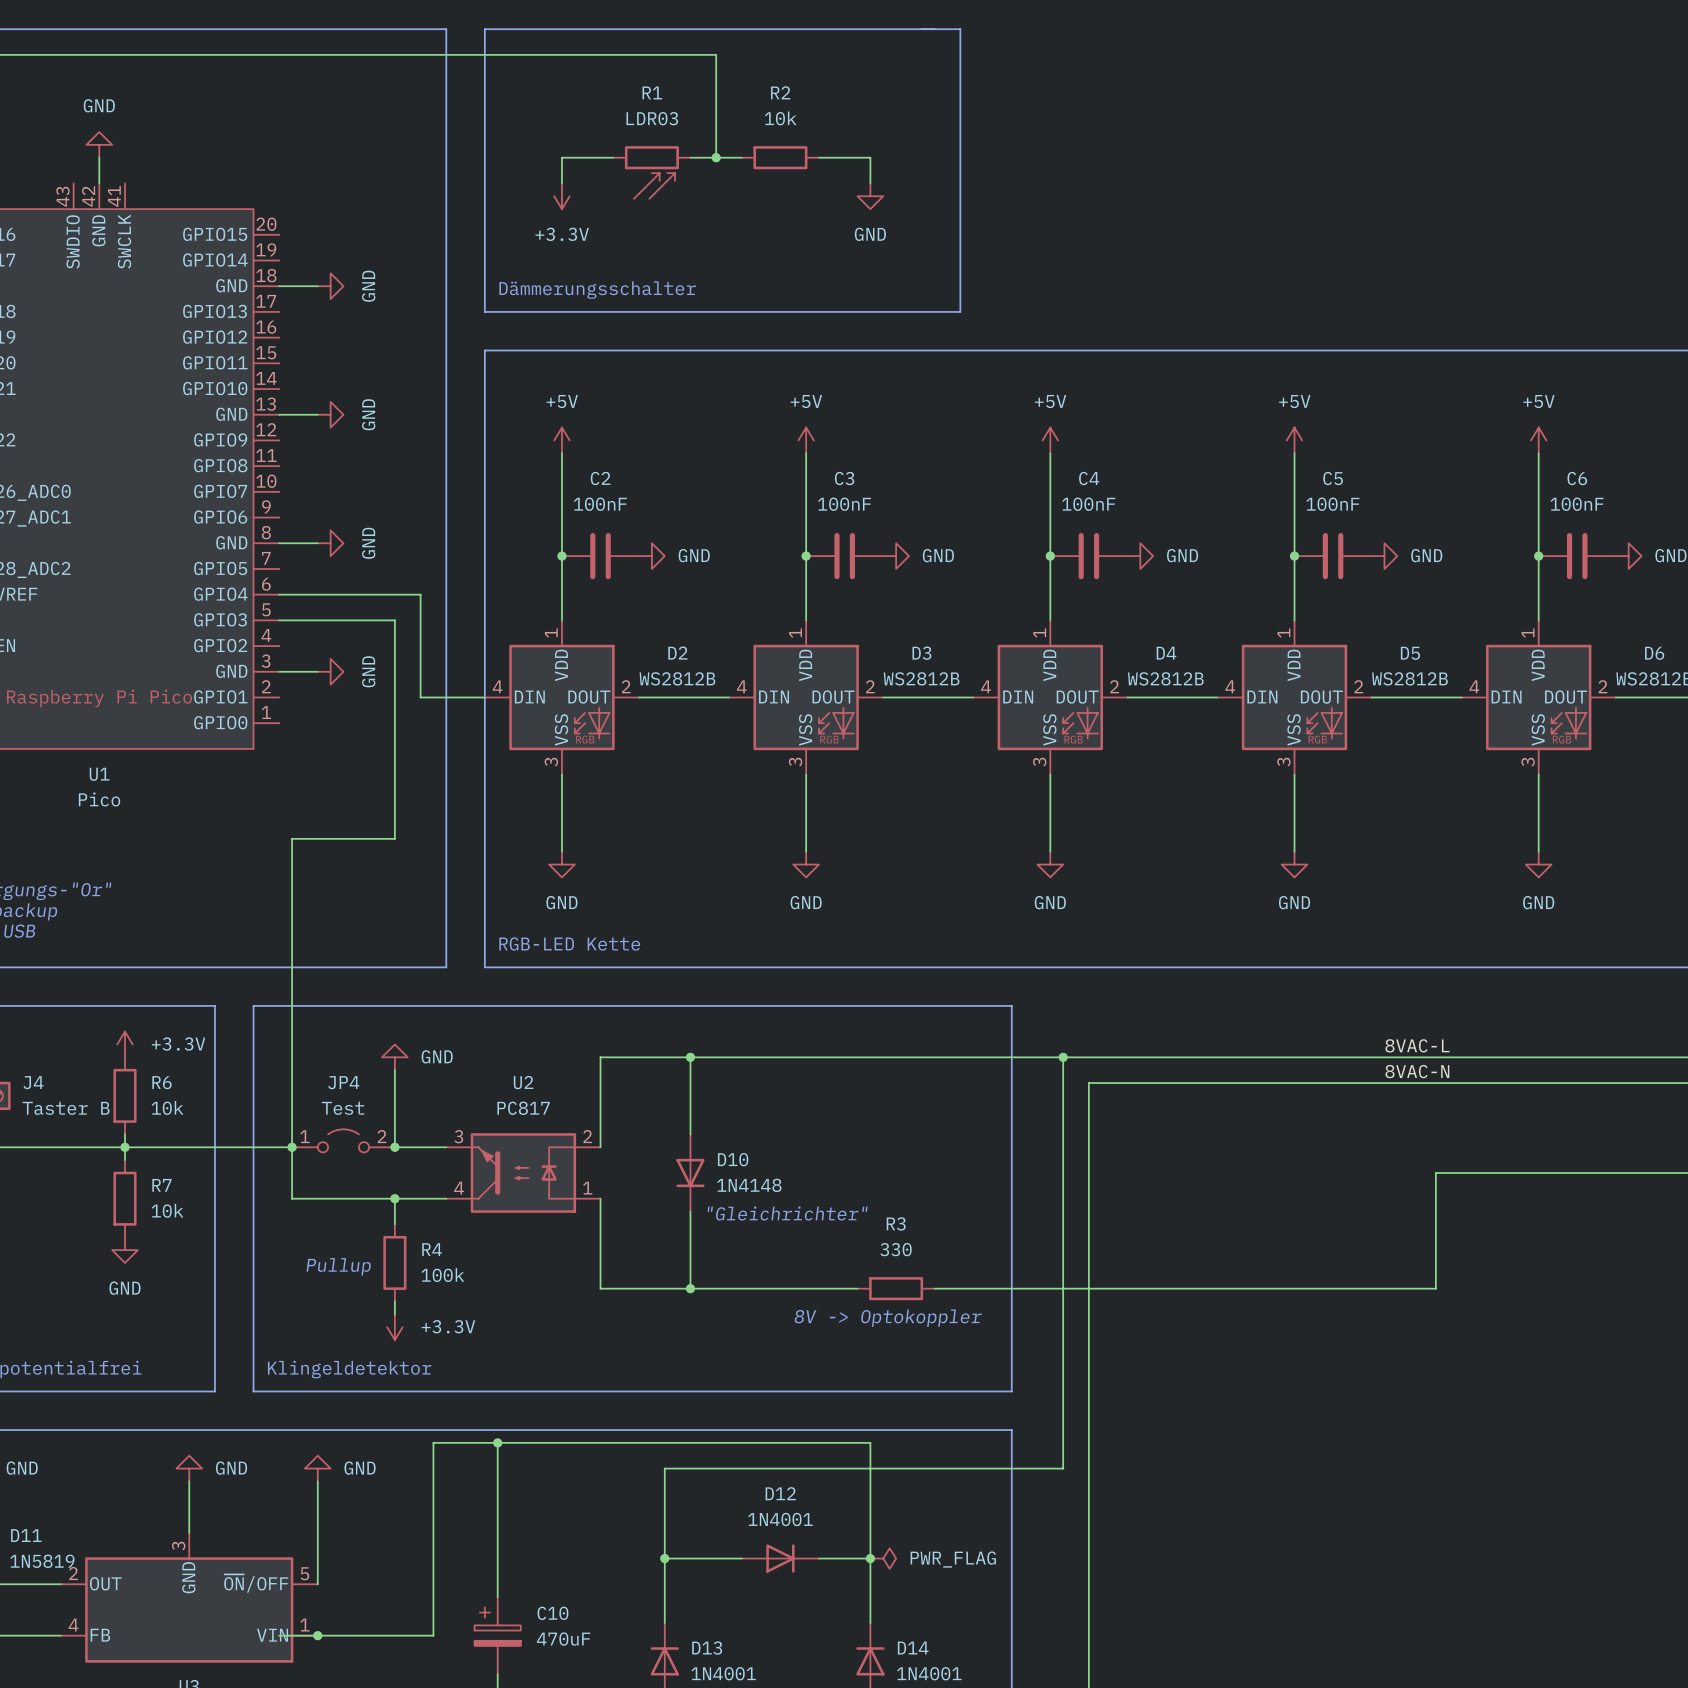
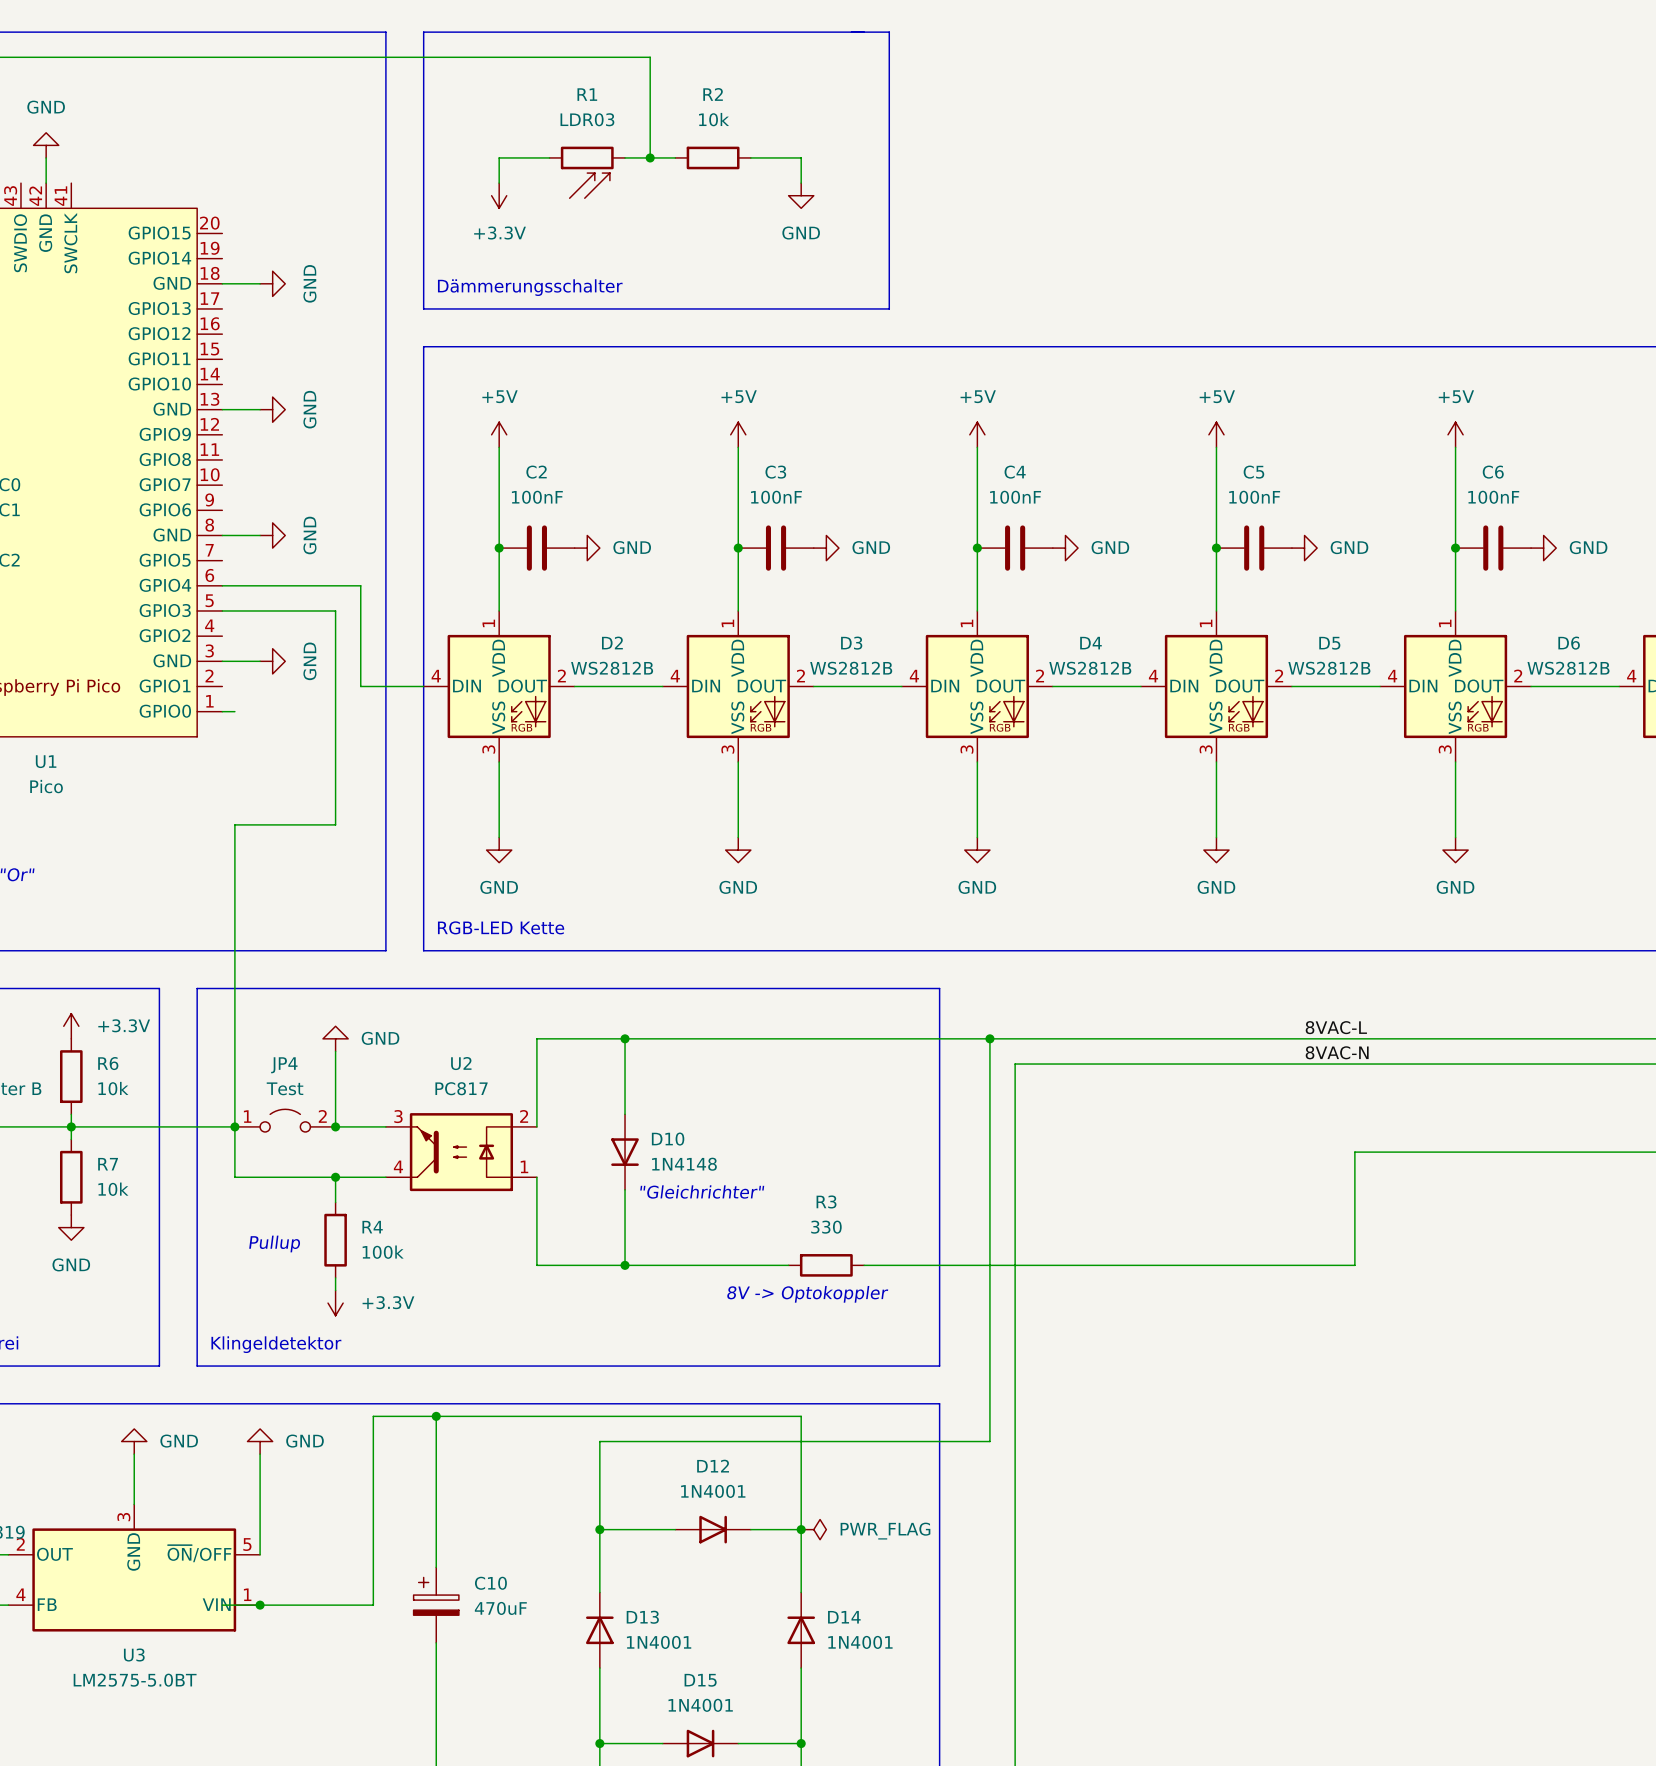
wire: none -> (222, 711) (234, 711)

